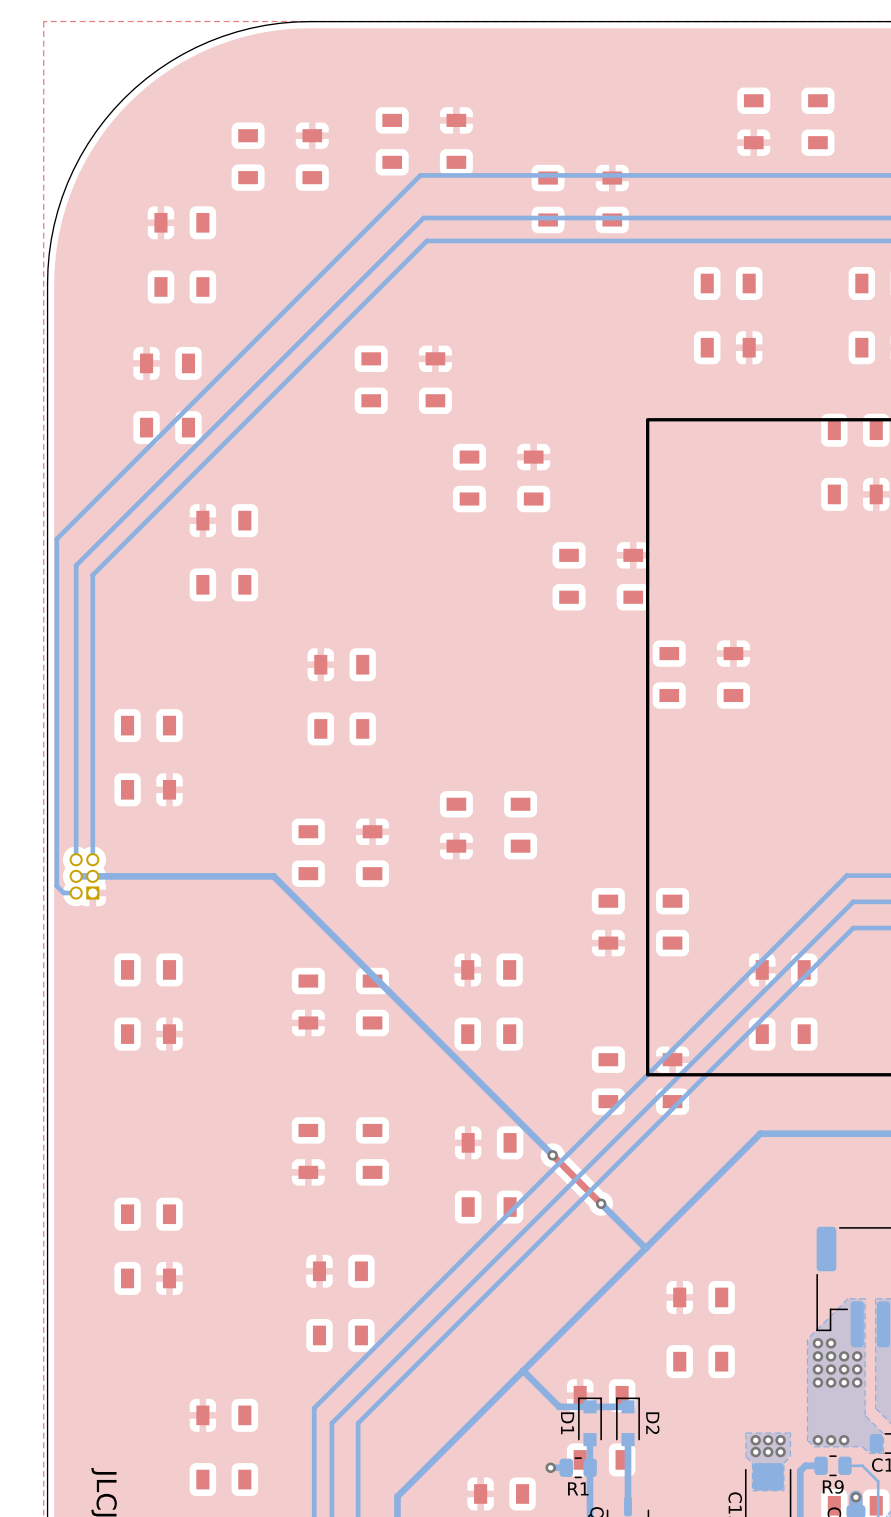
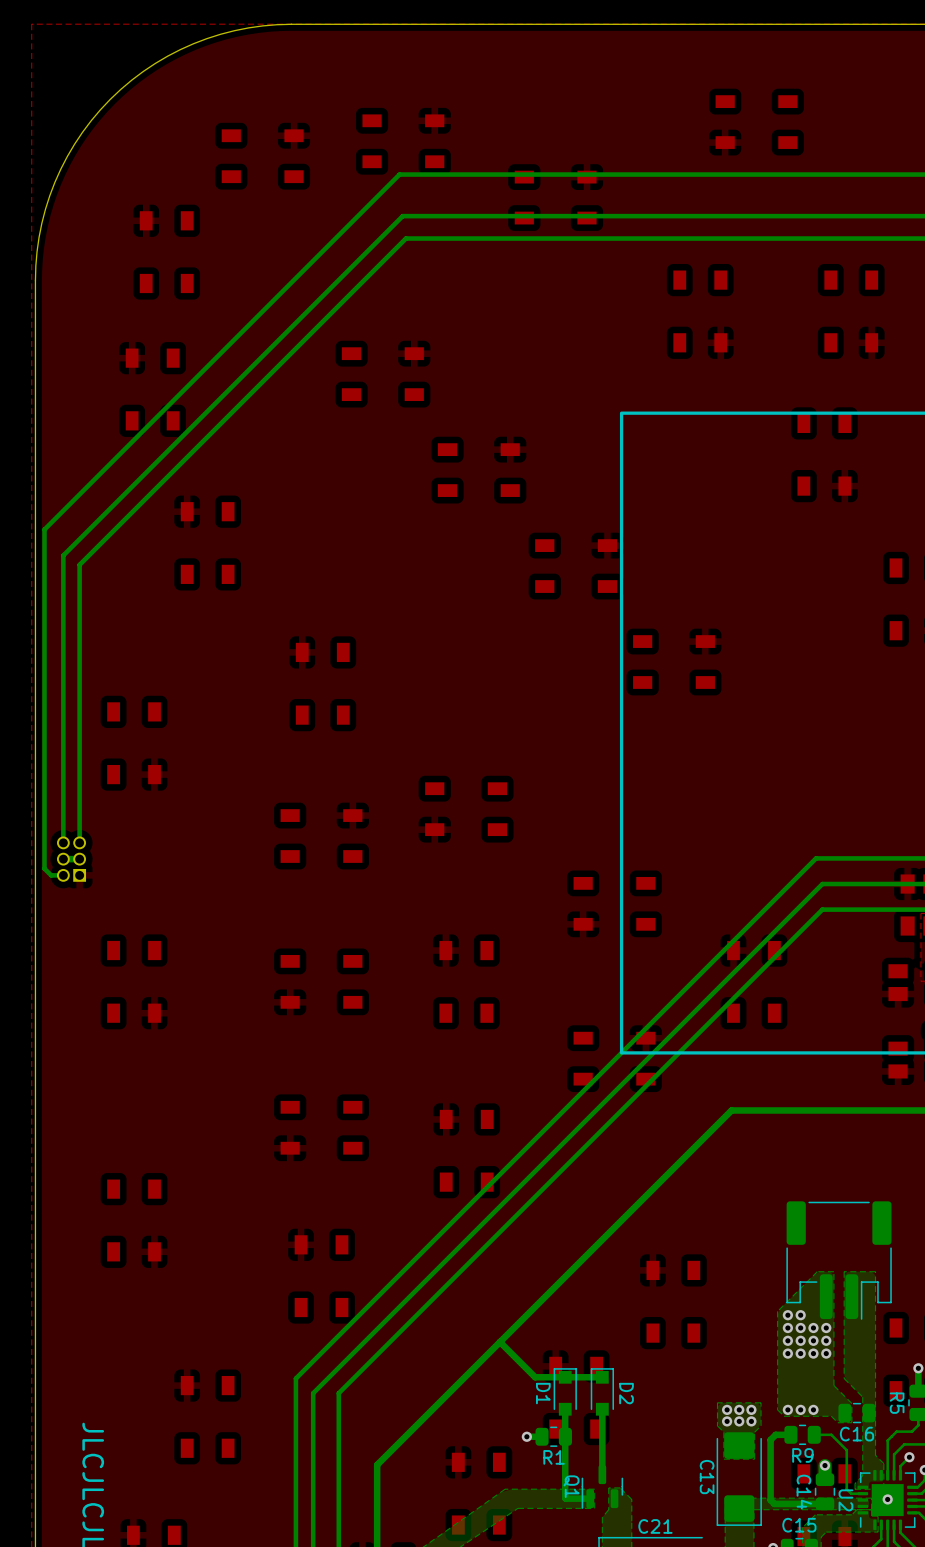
bottom track: (92, 876) (273, 876) (552, 1155) -> none
top track: (552, 1155) (601, 1203) -> none
via: (552, 1155) -> none
bottom track: (601, 1203) (645, 1248) -> none
via: (601, 1203) -> none

